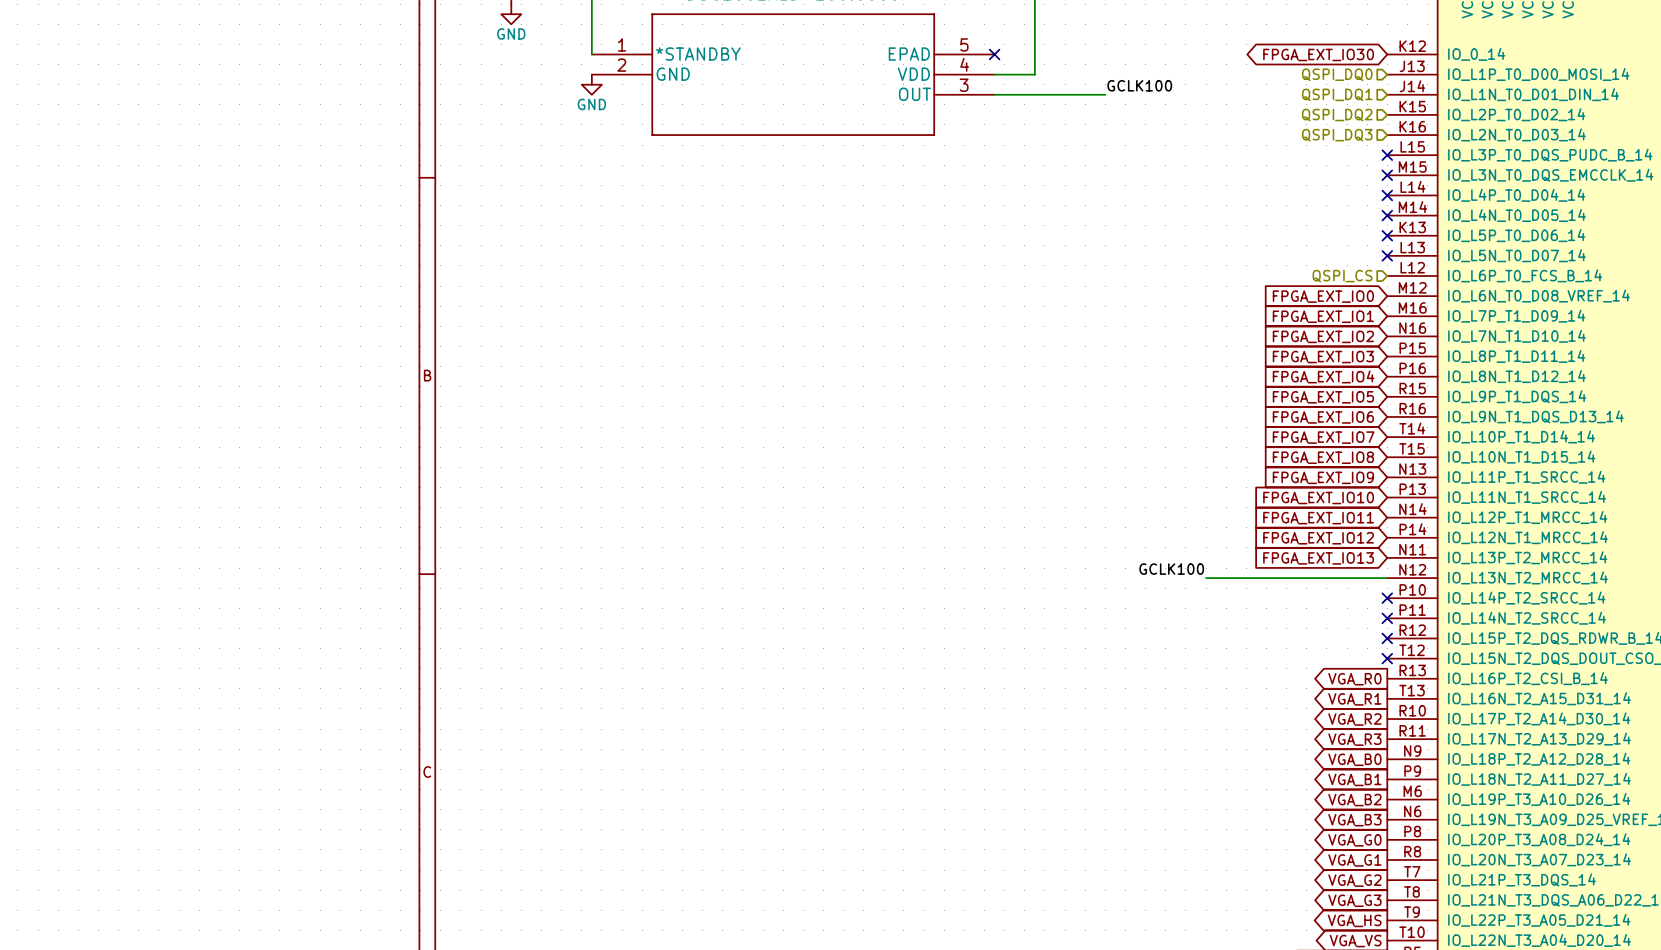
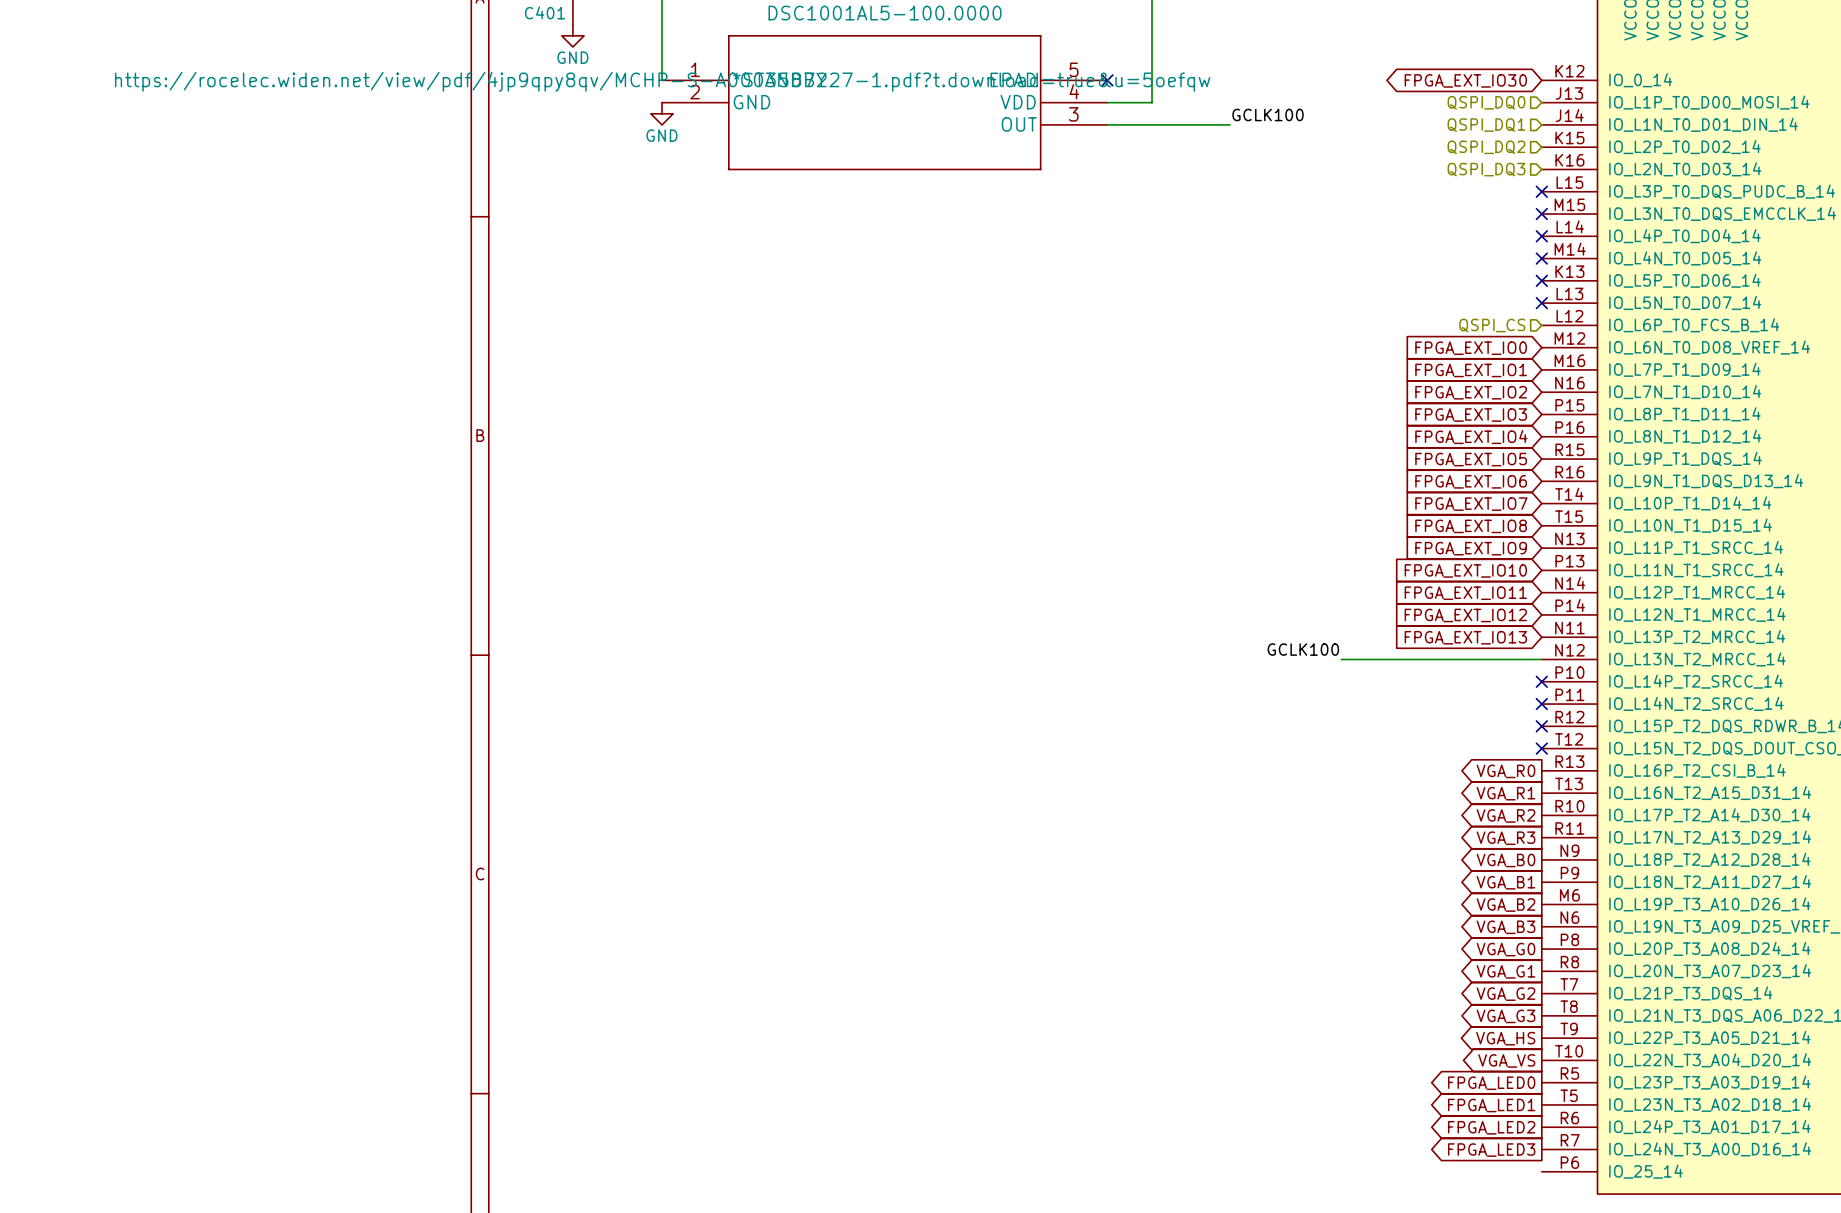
part text: none -> https://rocelec.widen.net/view/pdf/4jp9qpy8qv/MCHP-S-A0003587227-1.pdf?t.download=true&u=5oefqw (662, 81)

